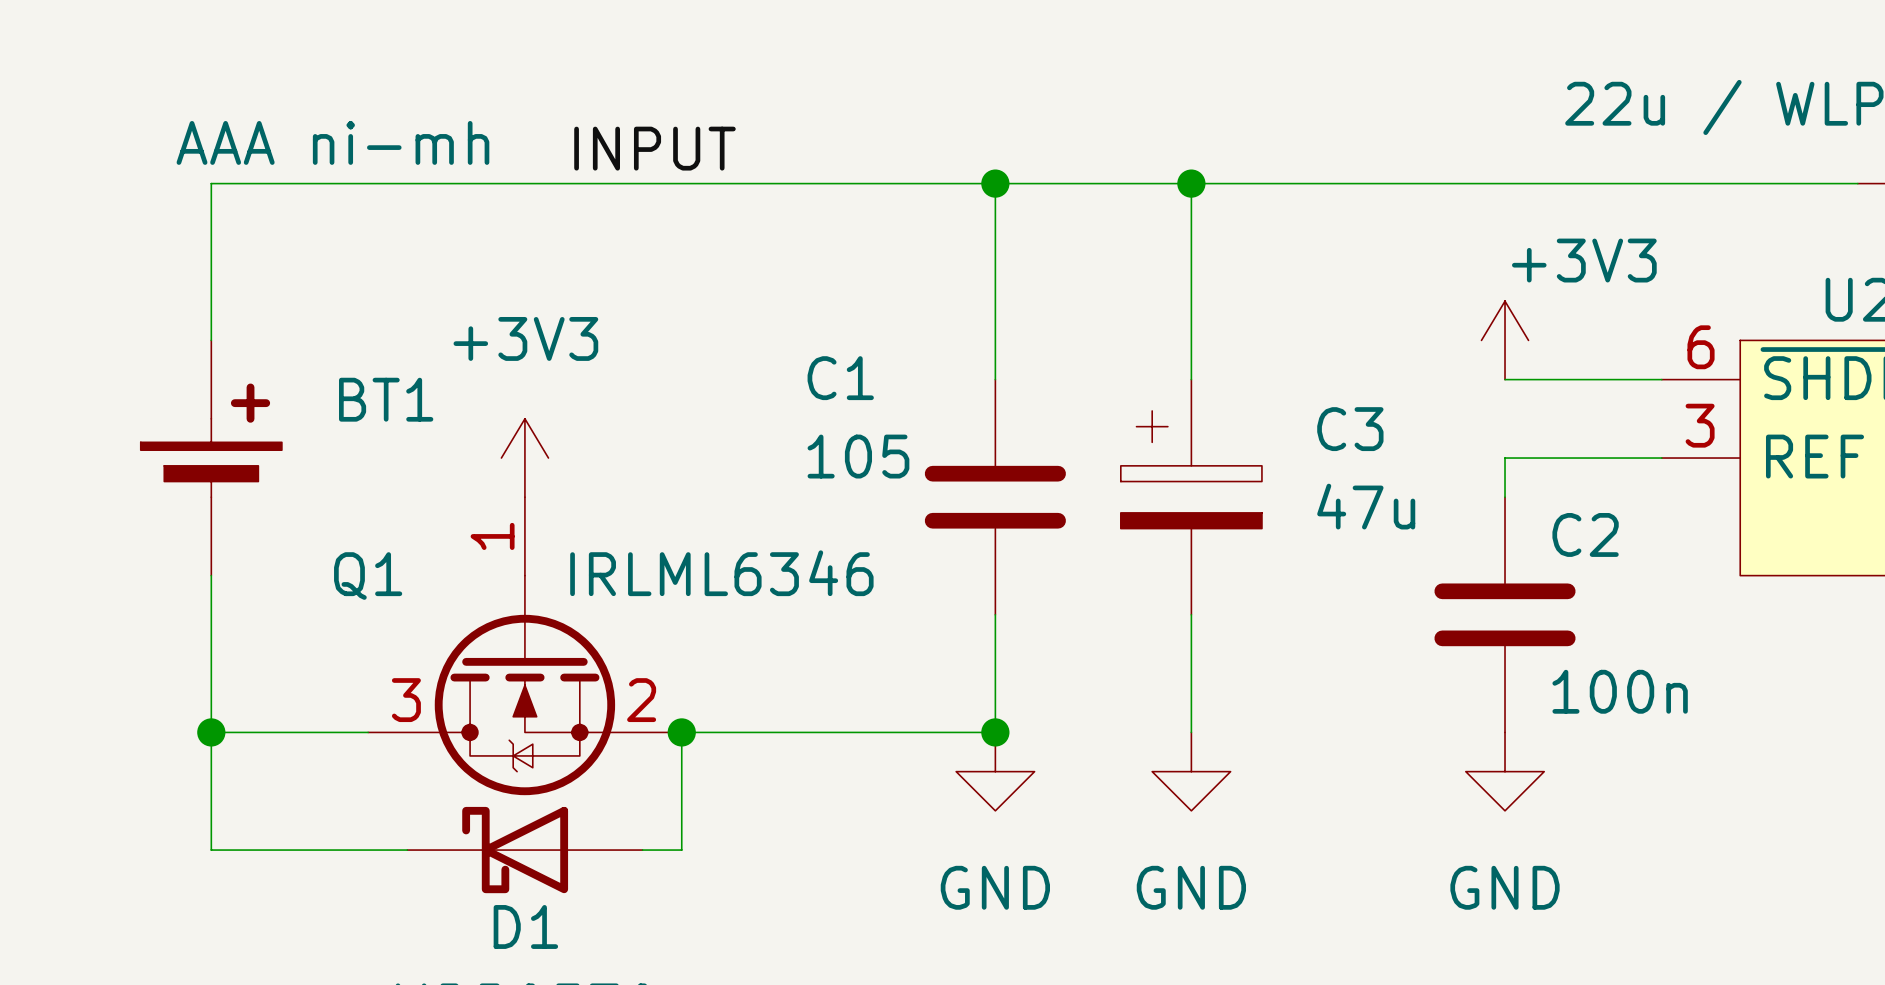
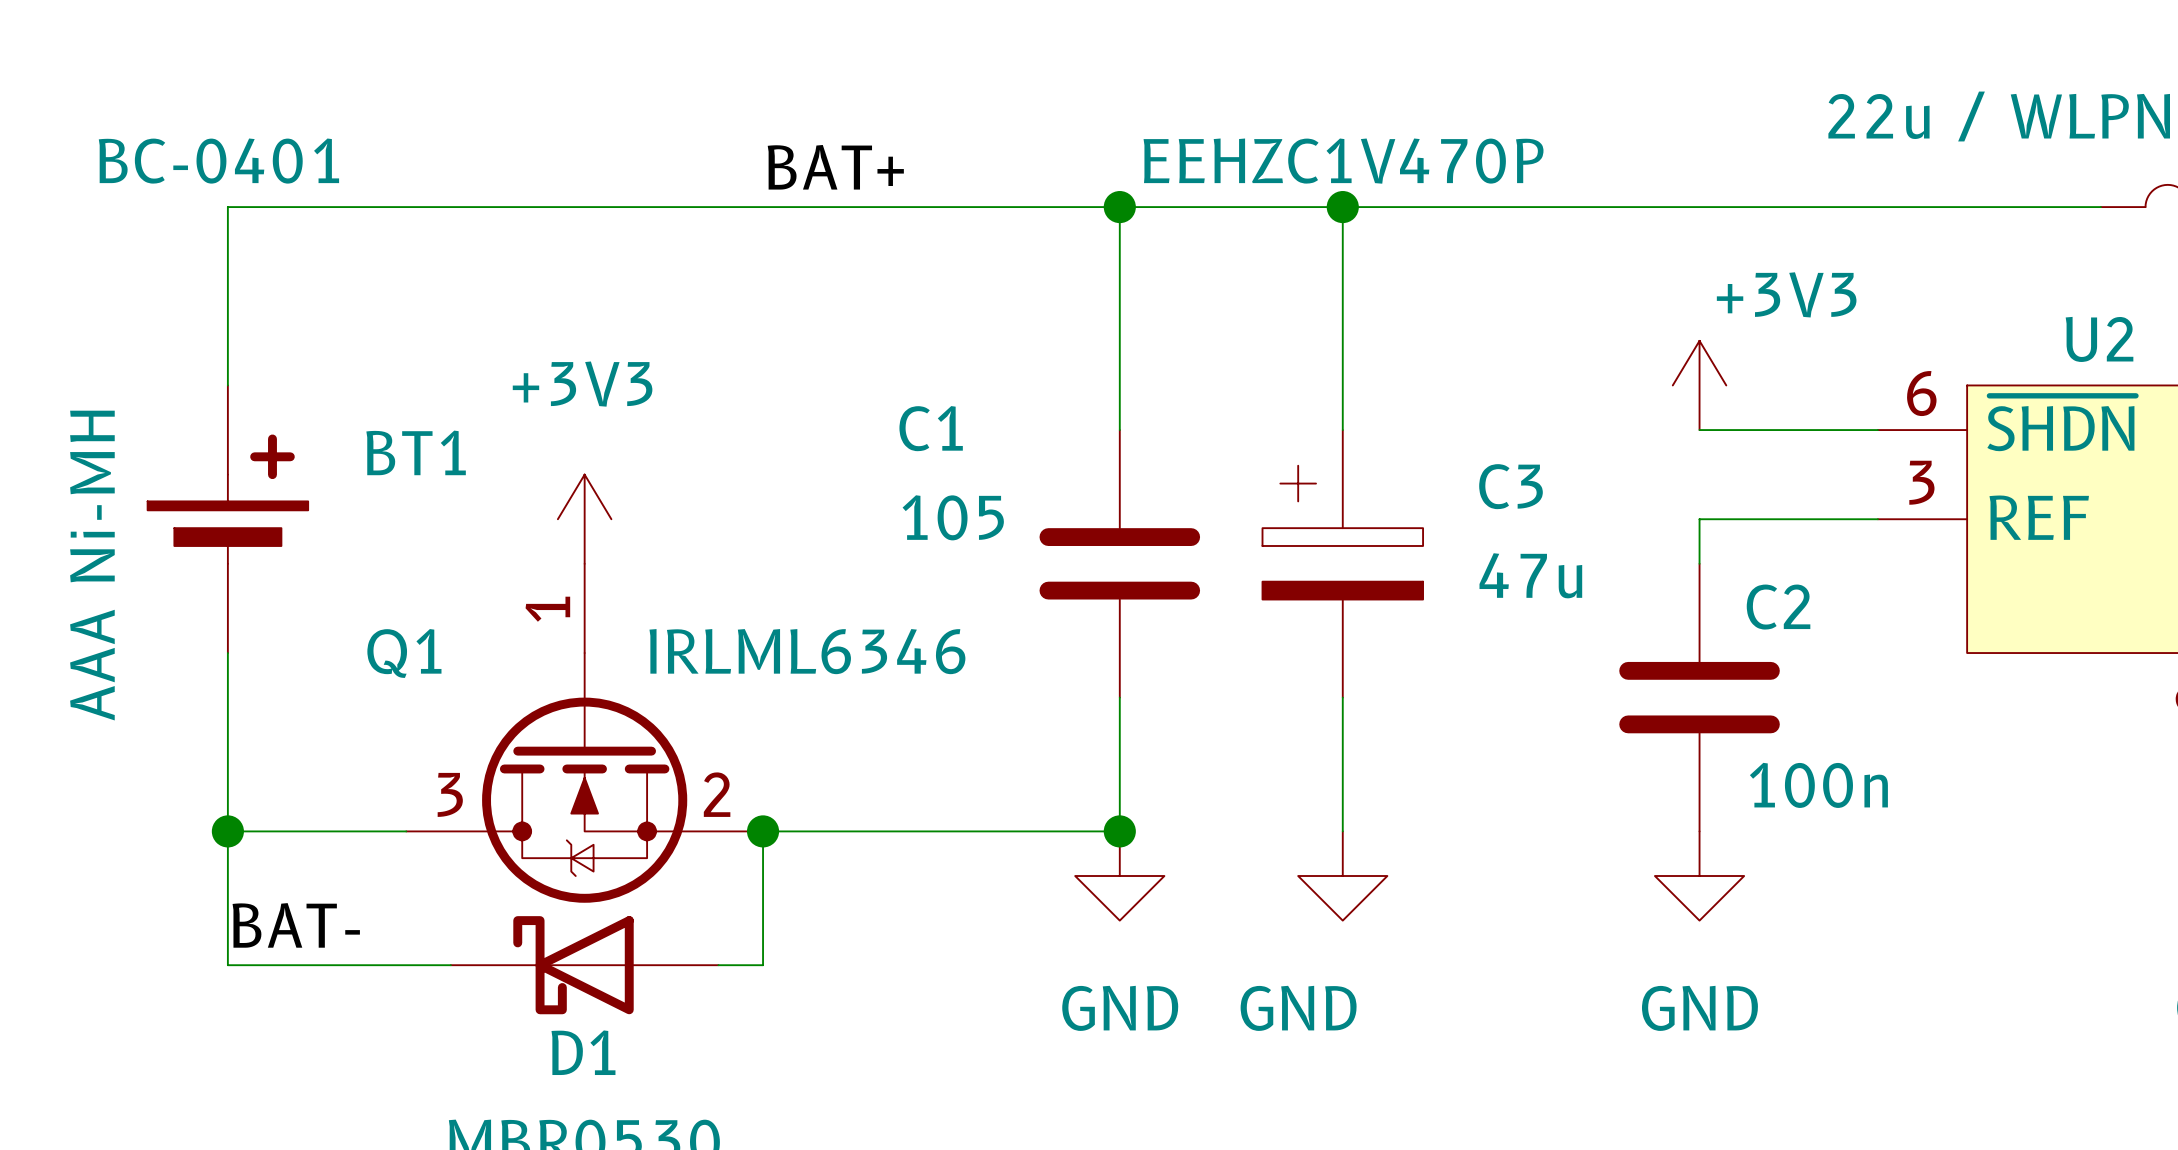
C3 text: none -> EEHZC1V470P (1343, 161)
BT1 value: AAA ni-mh (332, 142) -> BC-0401 (218, 161)
label: INPUT (654, 148) -> none
label: none -> BAT+ (835, 167)
BT1 text: none -> AAA Ni-MH (92, 565)
label: none -> BAT- (296, 925)
power symbol text position: GND (1191, 887) -> GND (1298, 1008)

